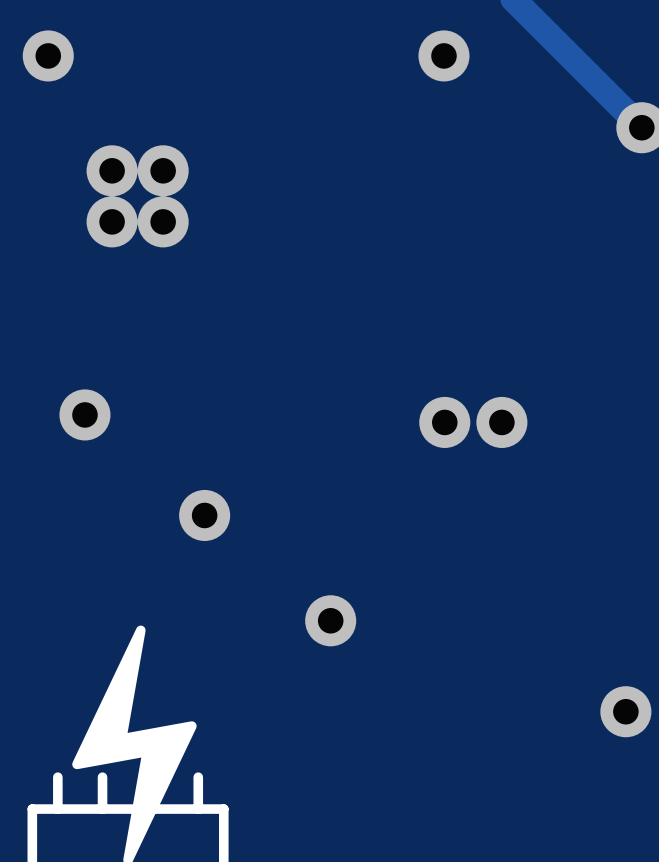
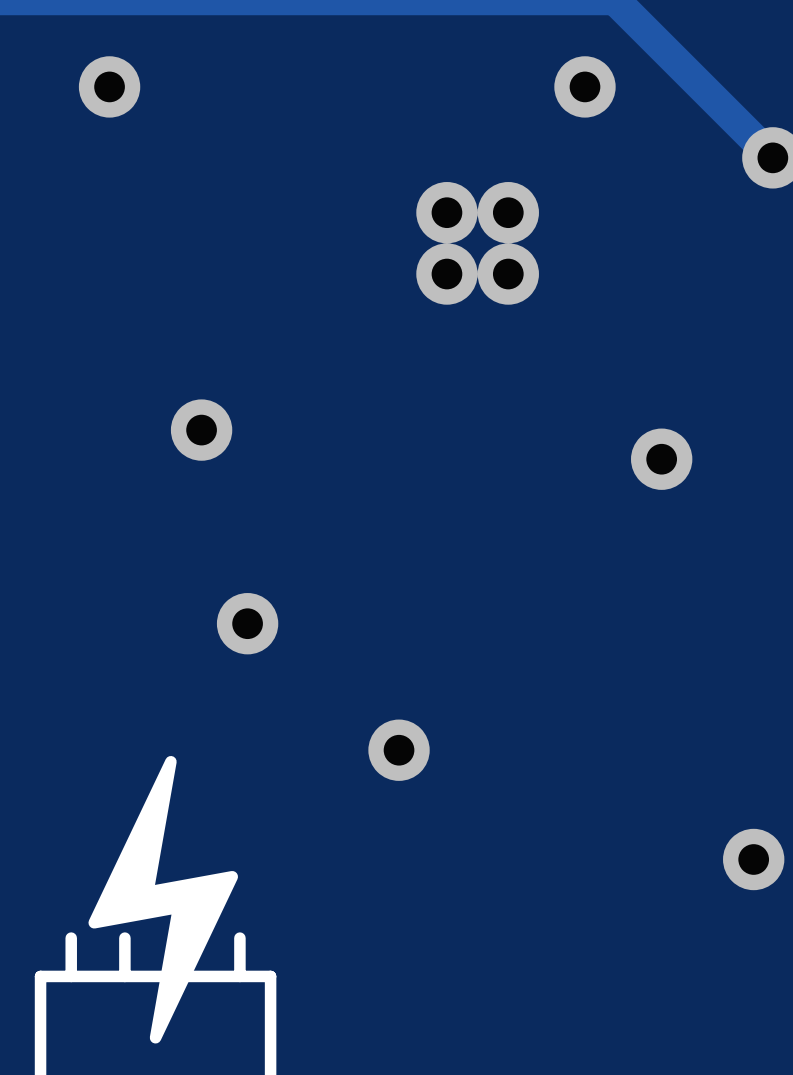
via position: (48, 55) -> (109, 86)
via position: (443, 55) -> (584, 86)
via: (112, 170) -> none
via: (163, 170) -> none
via: none -> (446, 212)
via: none -> (508, 212)
via: (112, 221) -> none
via: (163, 221) -> none
via: none -> (446, 274)
via: none -> (508, 274)
via: none -> (201, 430)
via: none -> (661, 459)
via: (84, 414) -> none
via: (444, 422) -> none
via: (501, 422) -> none

